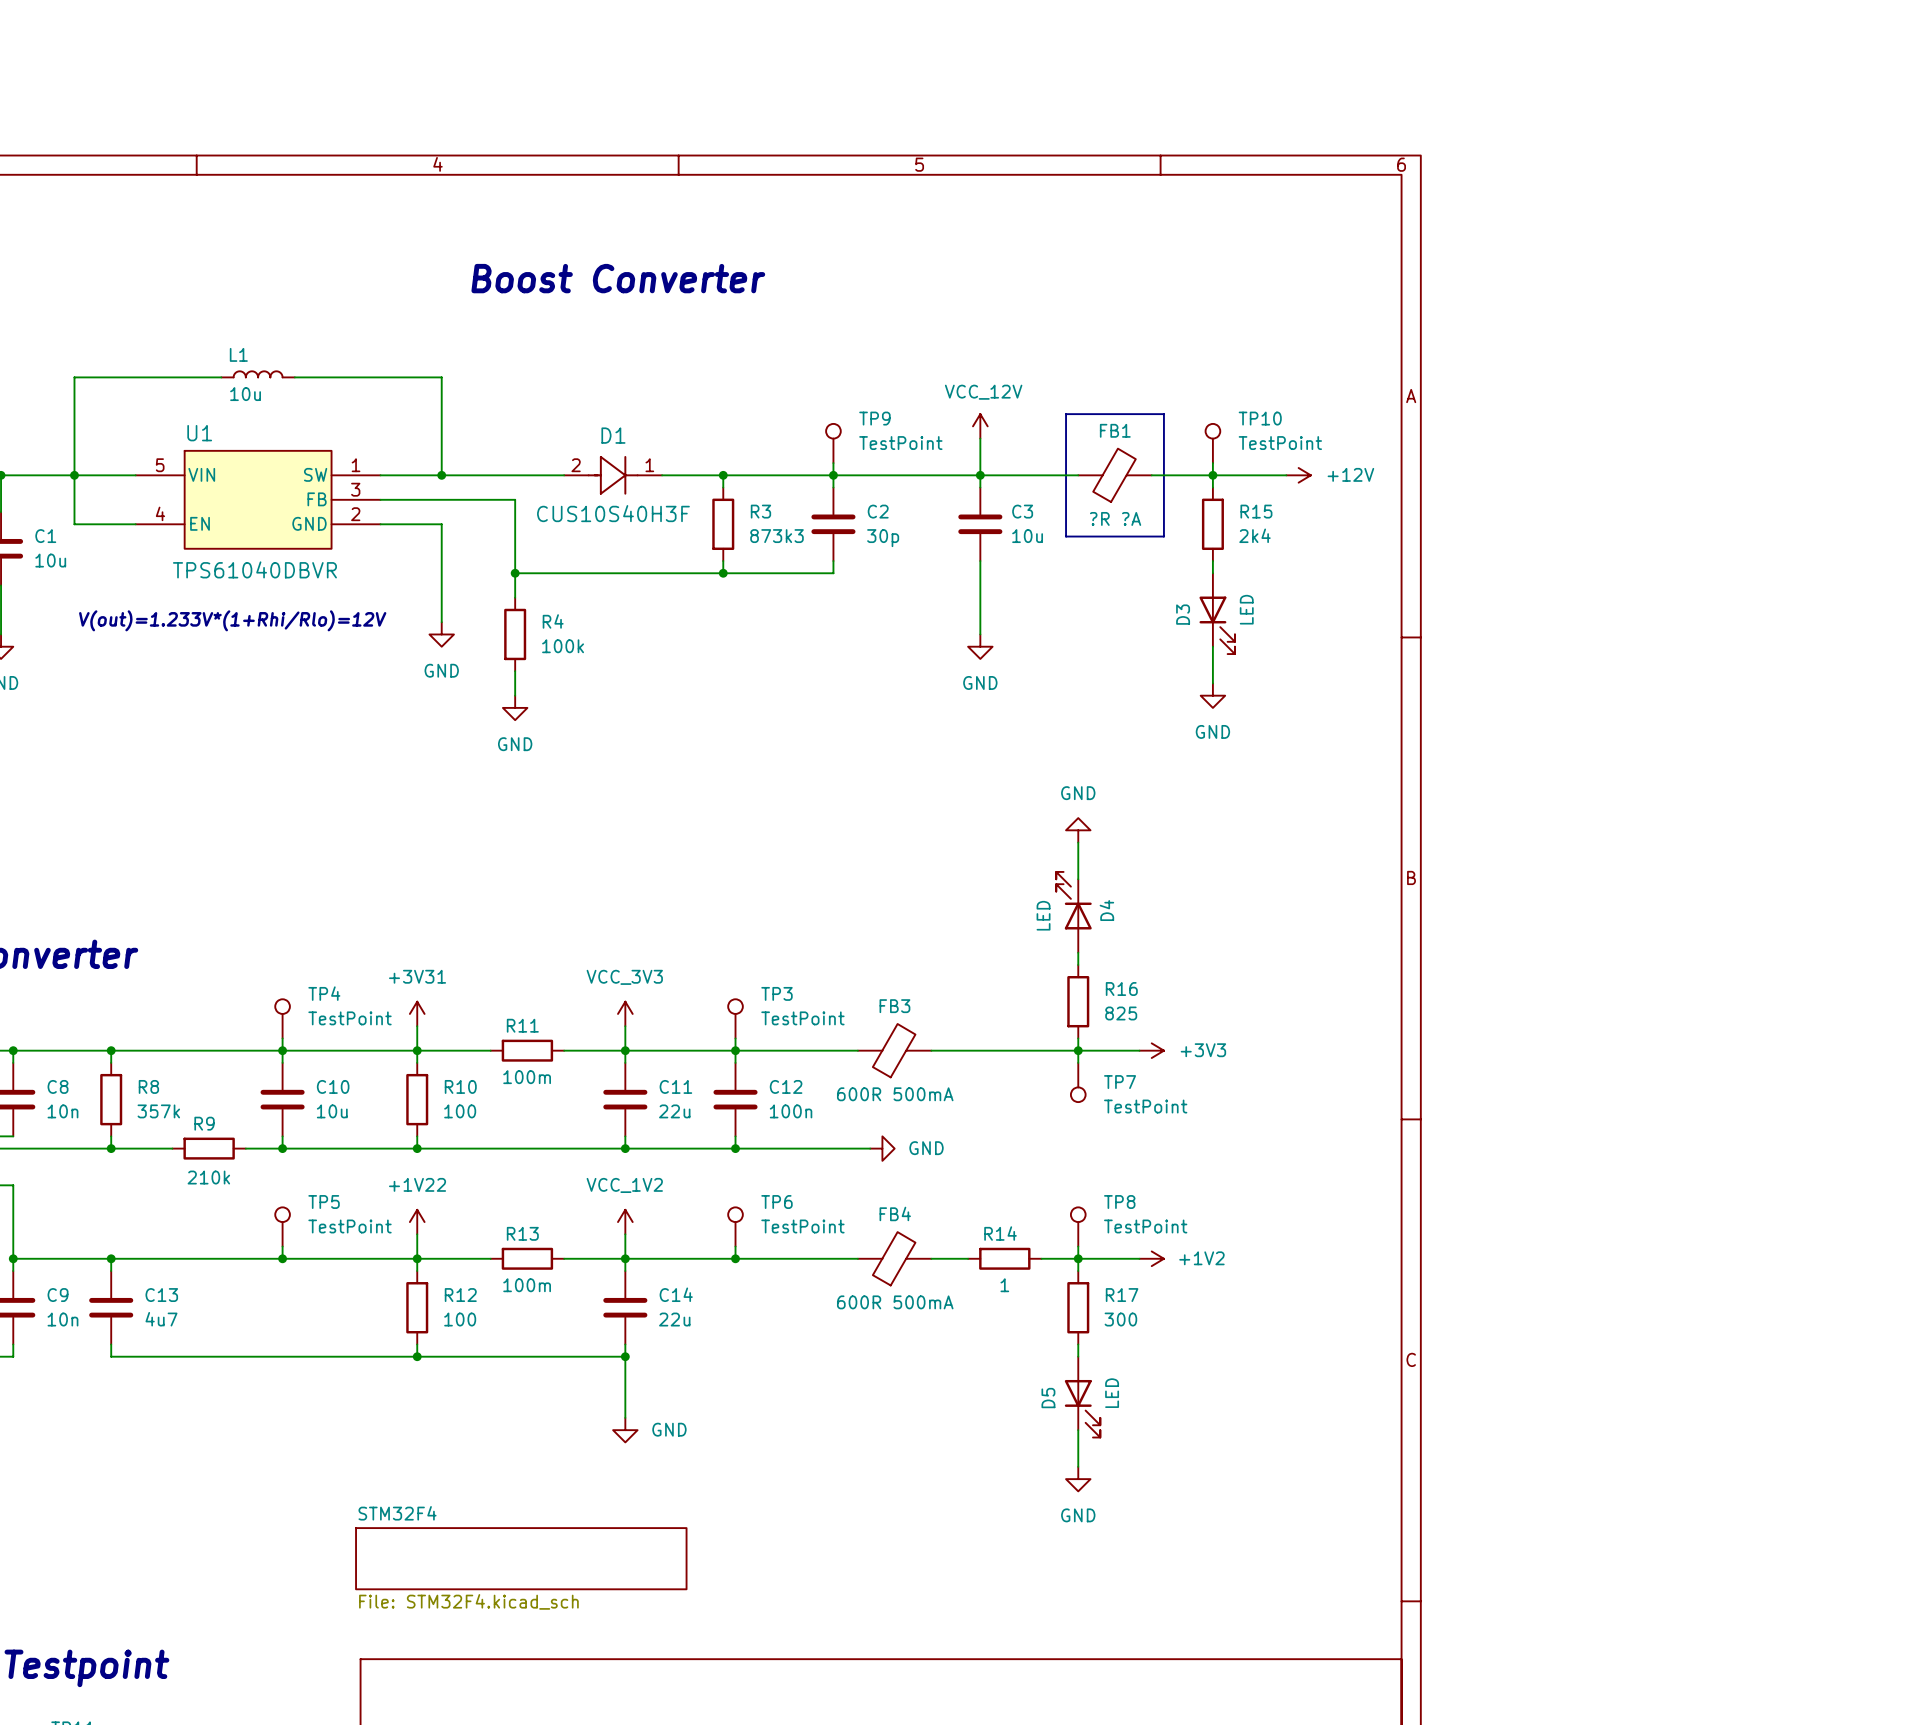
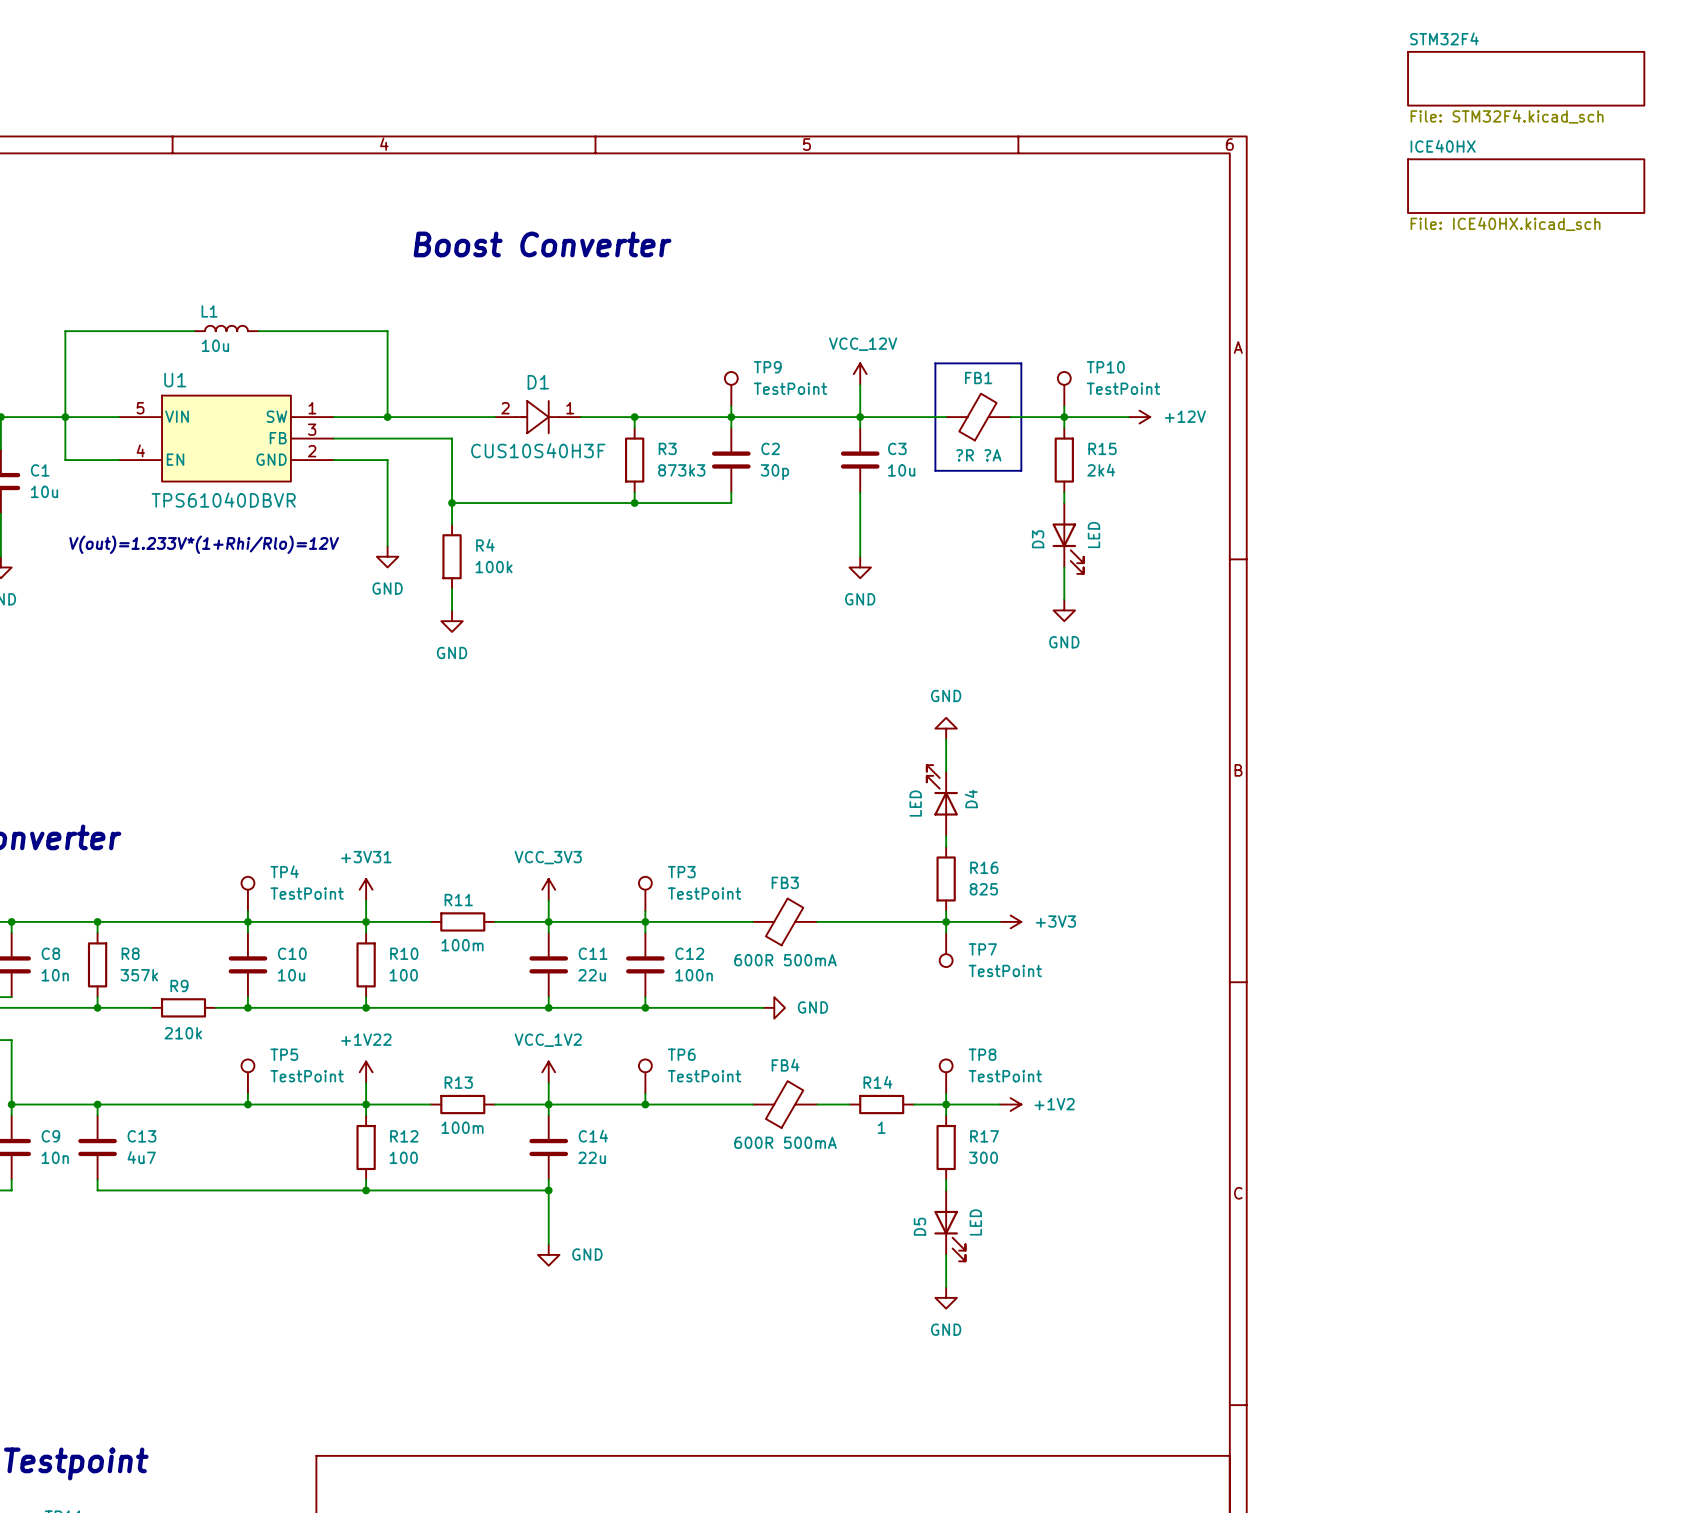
sheet ICE40HX: none -> File: ICE40HX.kicad_sch (1526, 186)
sheet STM32F4 name position: STM32F4 (397, 1513) -> STM32F4 (1444, 38)
sheet STM32F4 shape: [355, 1527, 688, 1591] -> [1407, 51, 1645, 107]
sheet STM32F4 value position: File: STM32F4.kicad_sch (468, 1601) -> File: STM32F4.kicad_sch (1507, 116)

